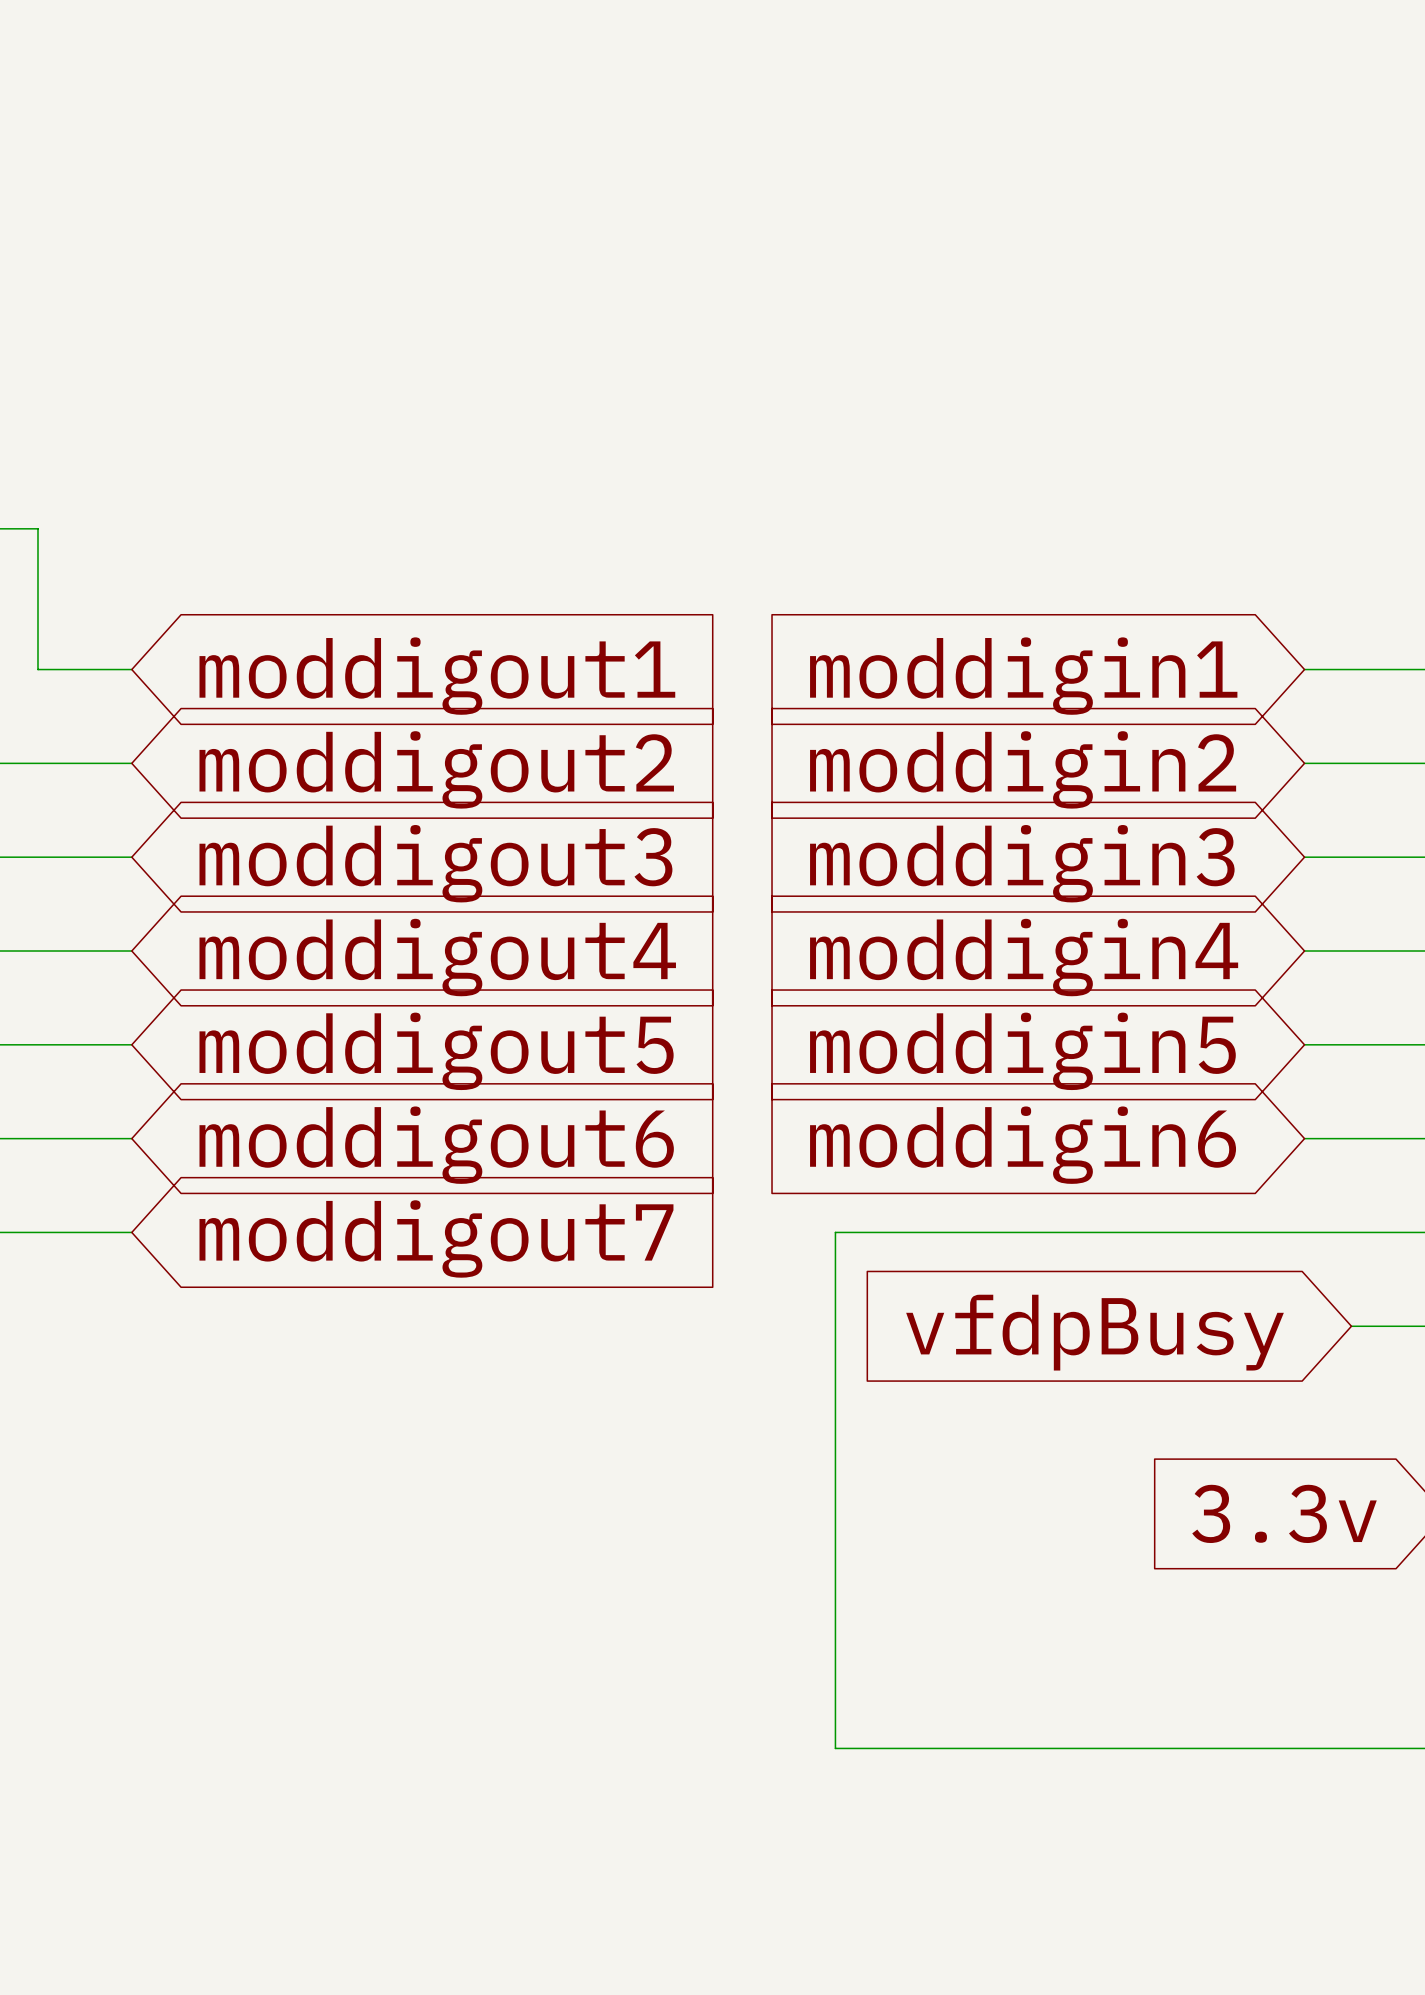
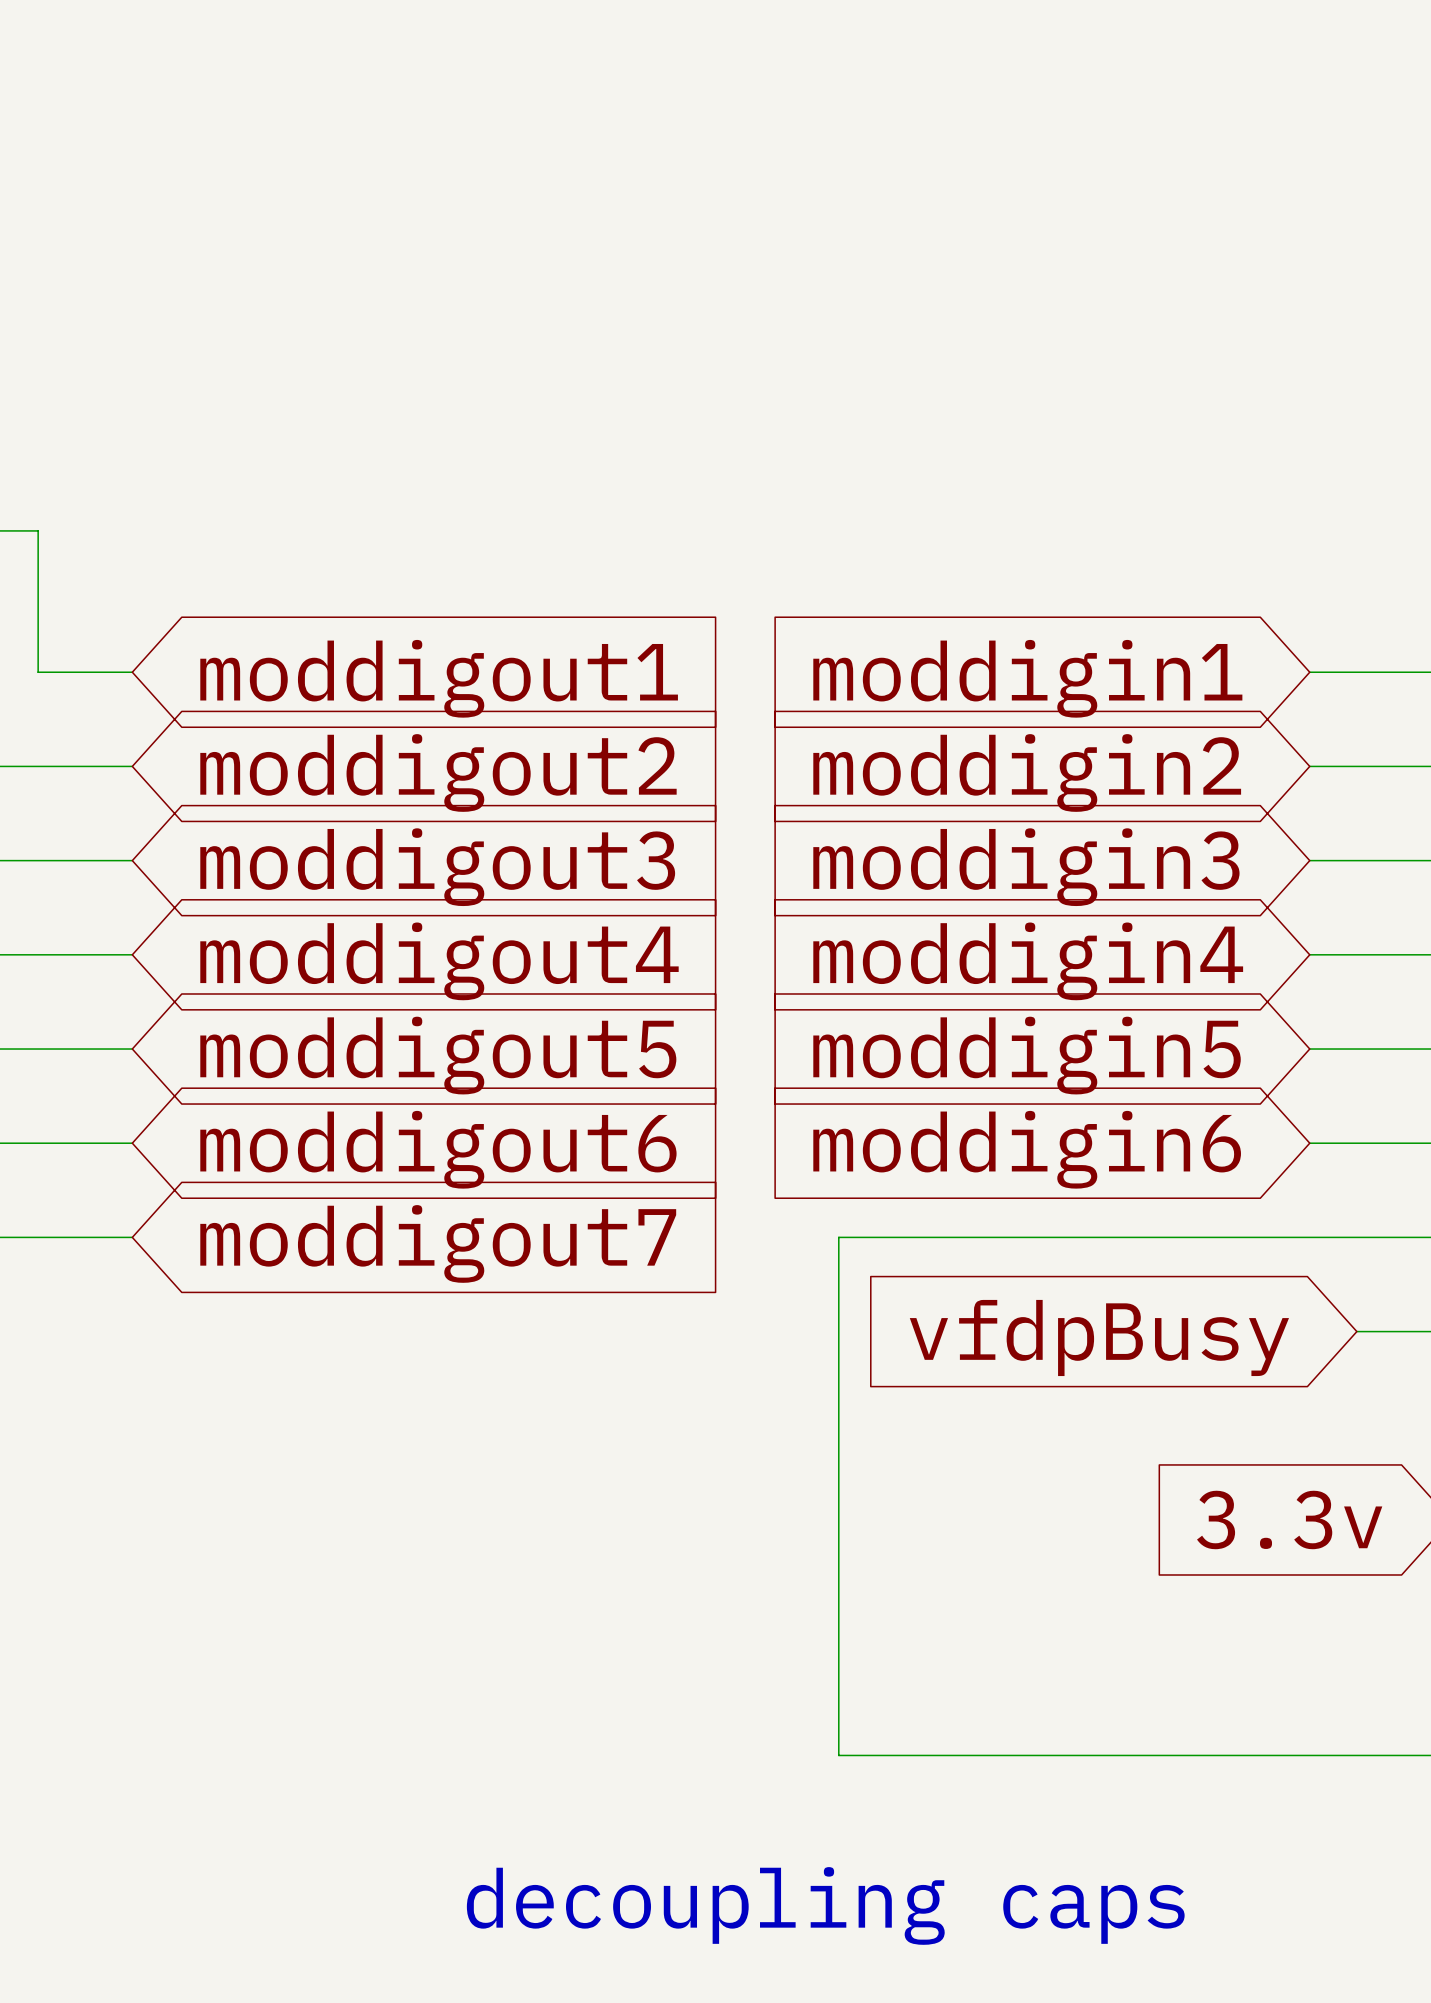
text: none -> decoupling caps (825, 1905)

